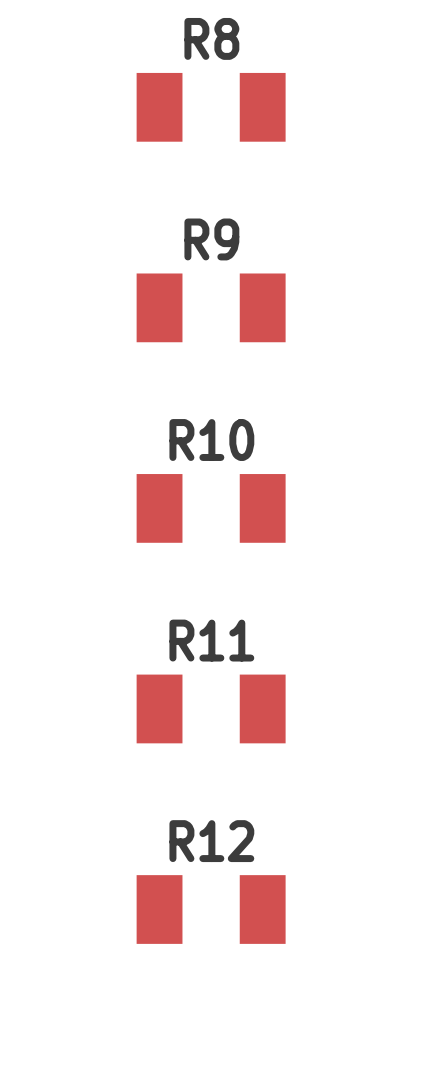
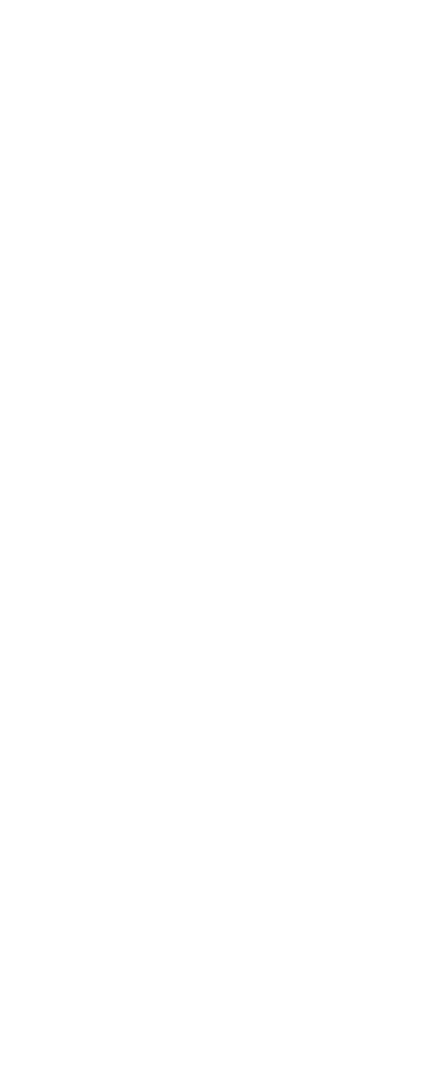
R8: (211, 107) -> none
R9: (211, 307) -> none
R10: (211, 508) -> none
R11: (211, 708) -> none
R12: (211, 909) -> none

